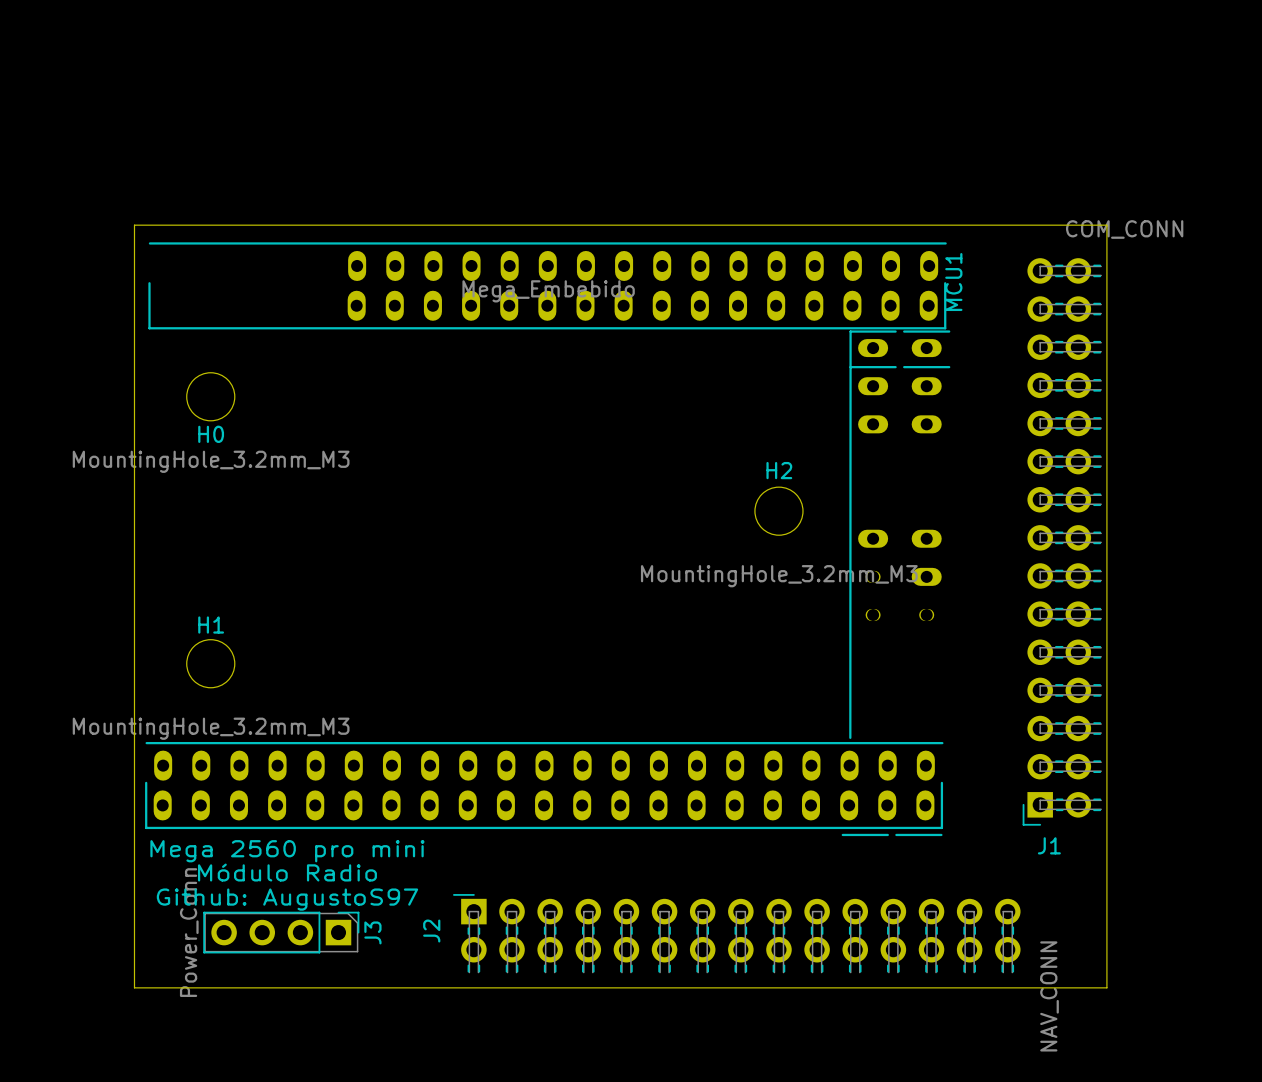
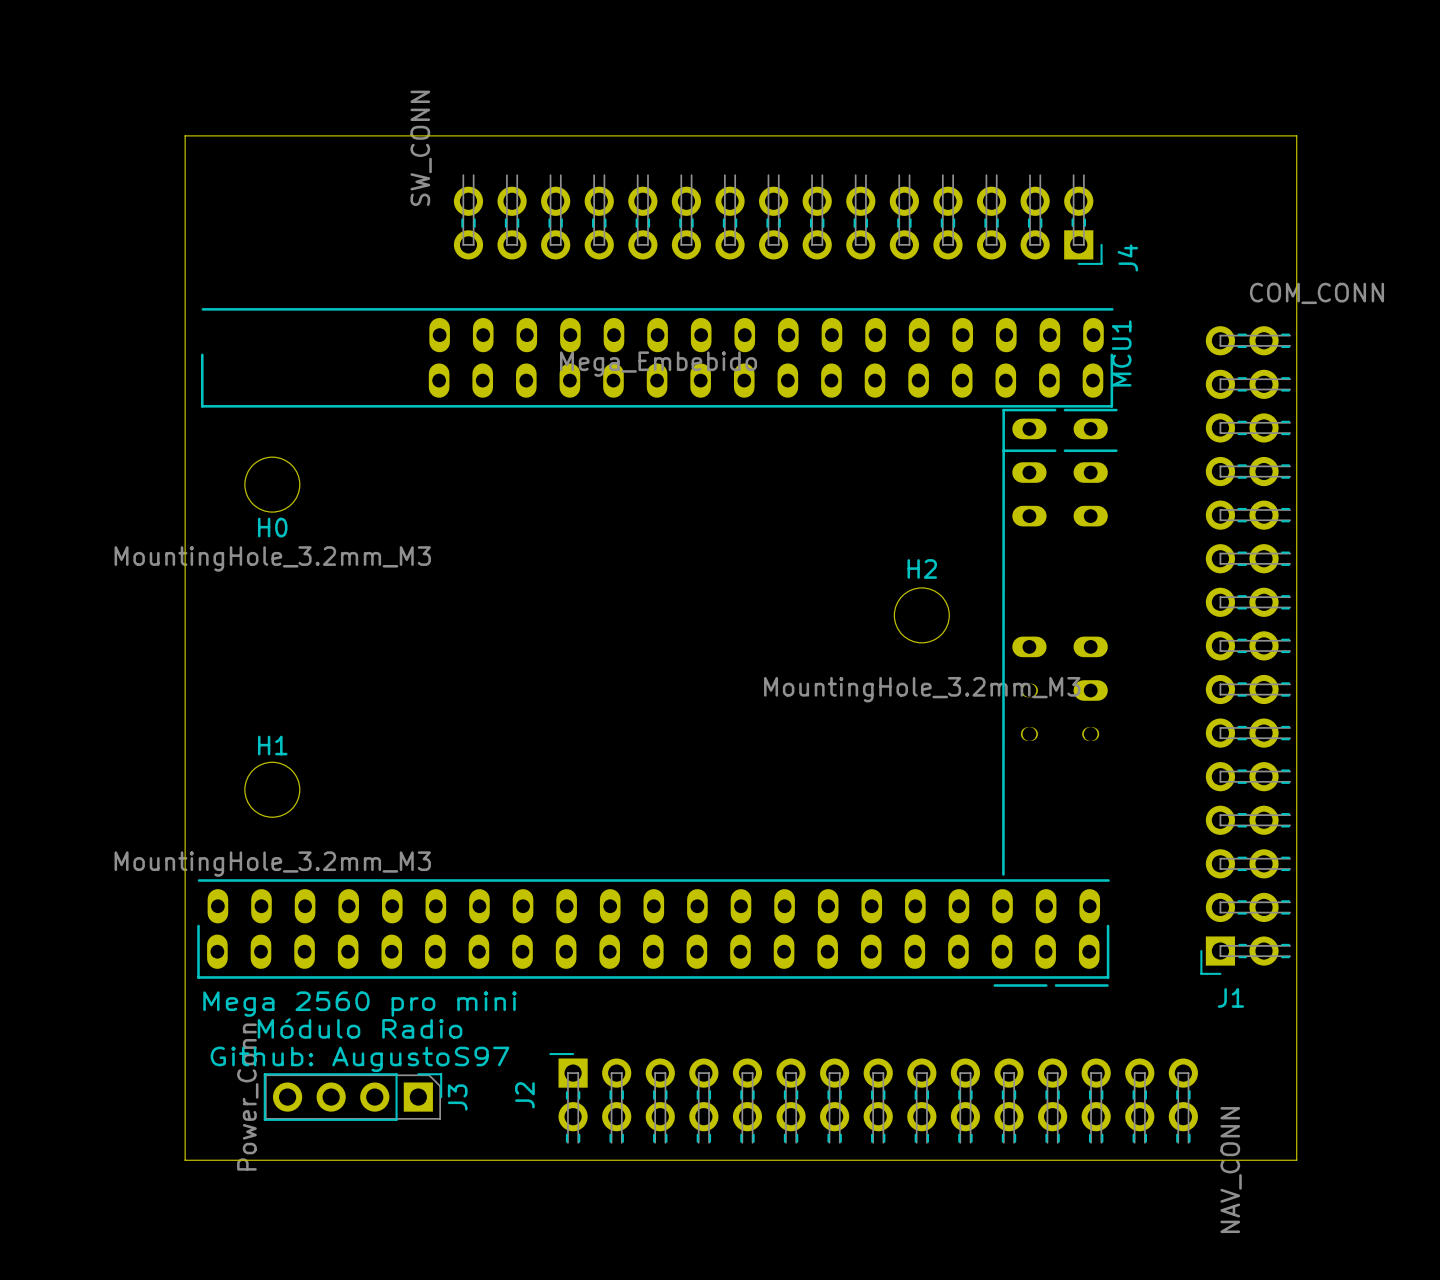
J4: none -> SW_CONN (778, 219)
board edge: (134, 225) (1106, 225) -> (185, 288) (185, 135) (1296, 135) (1296, 288)

